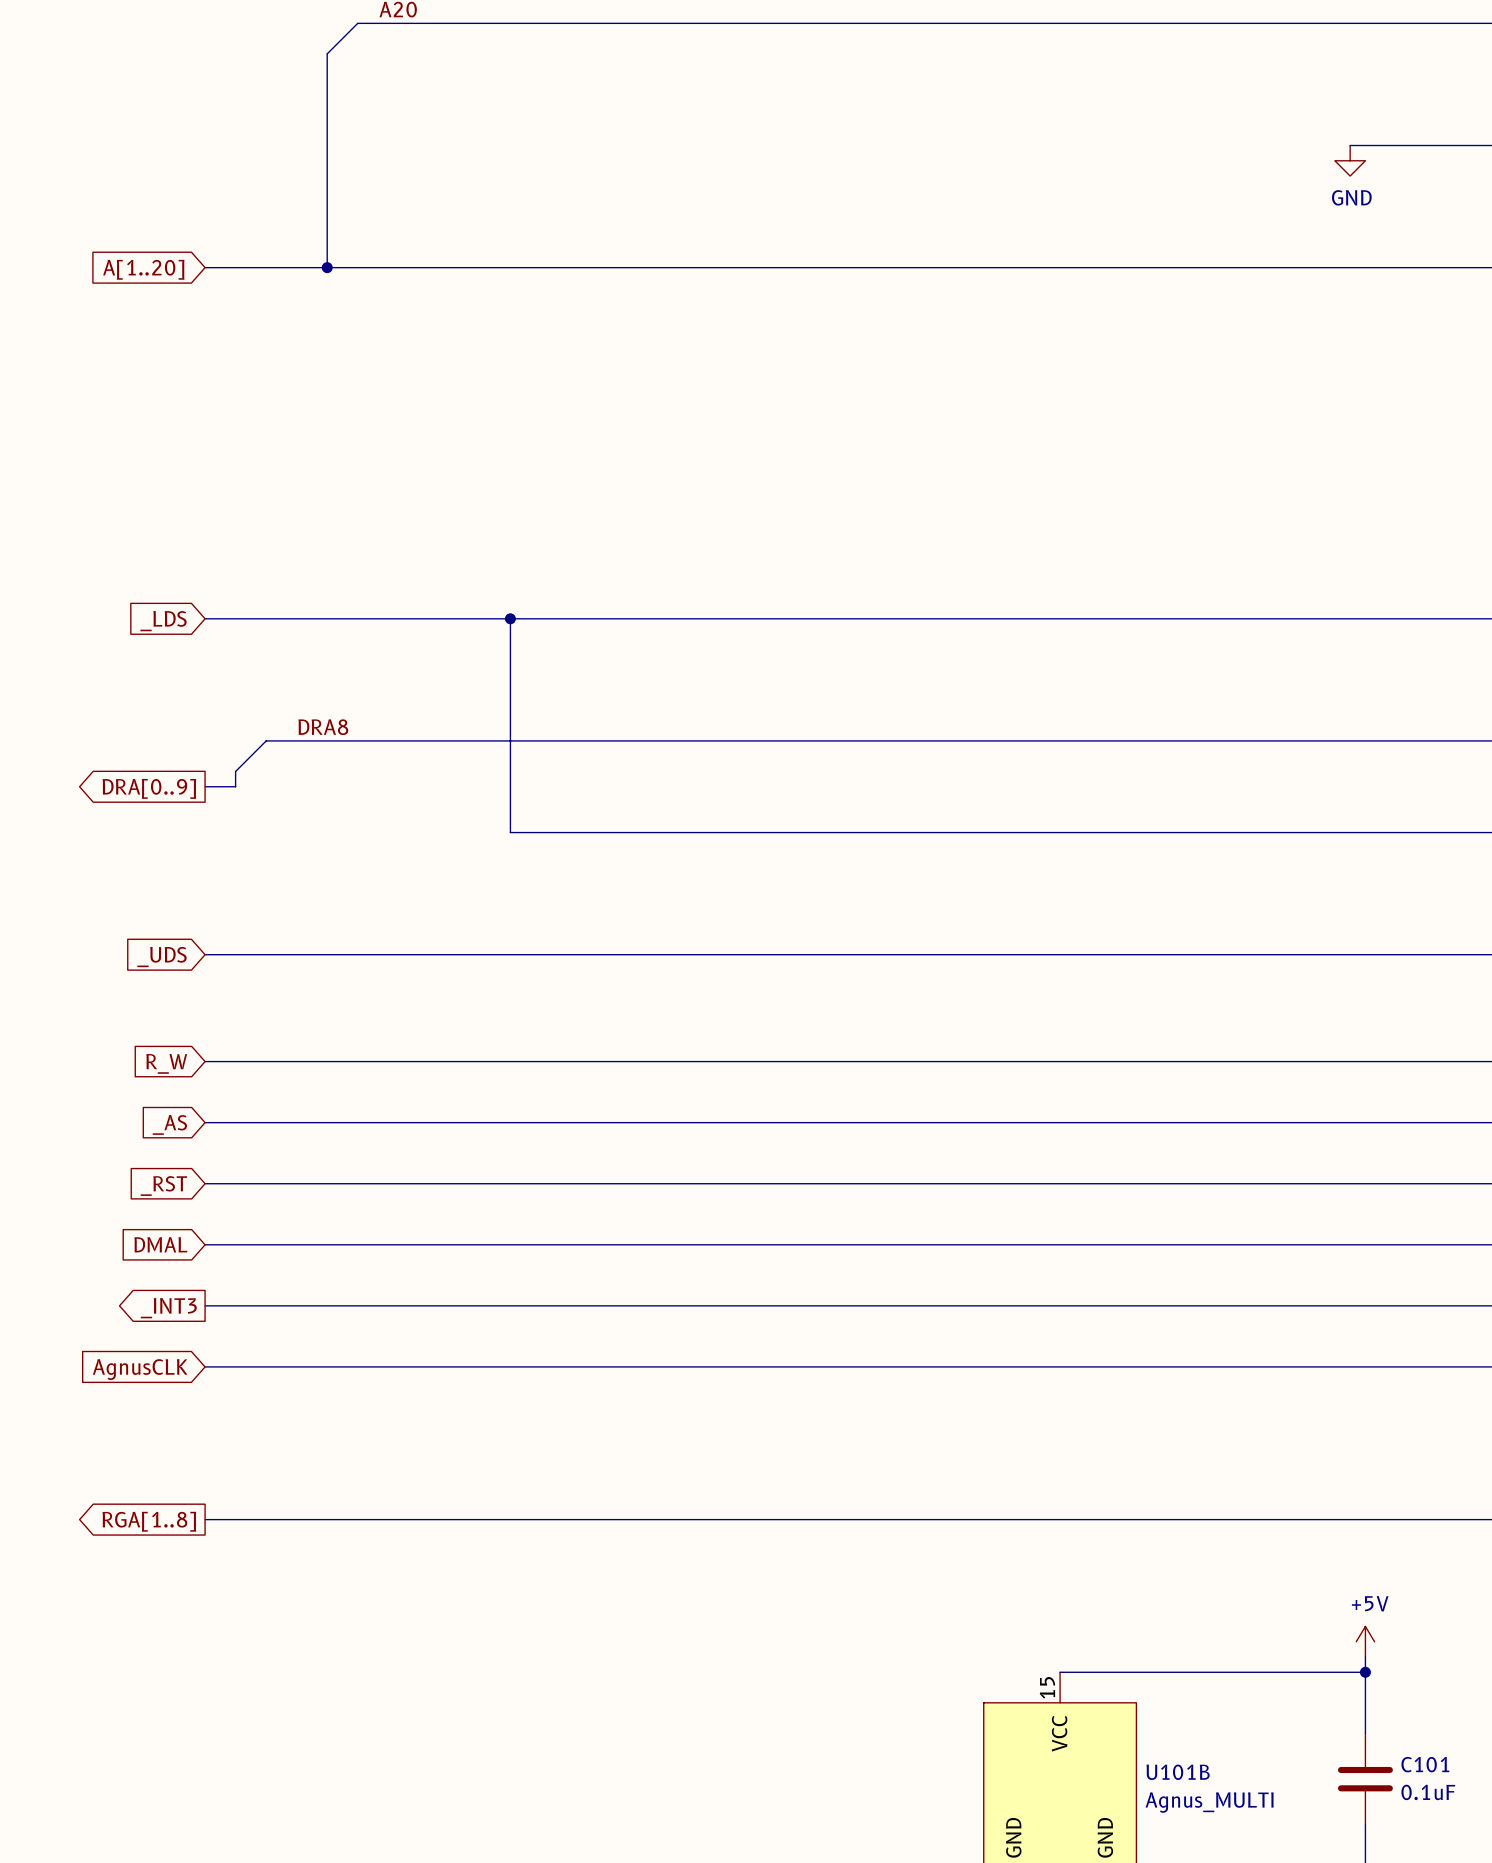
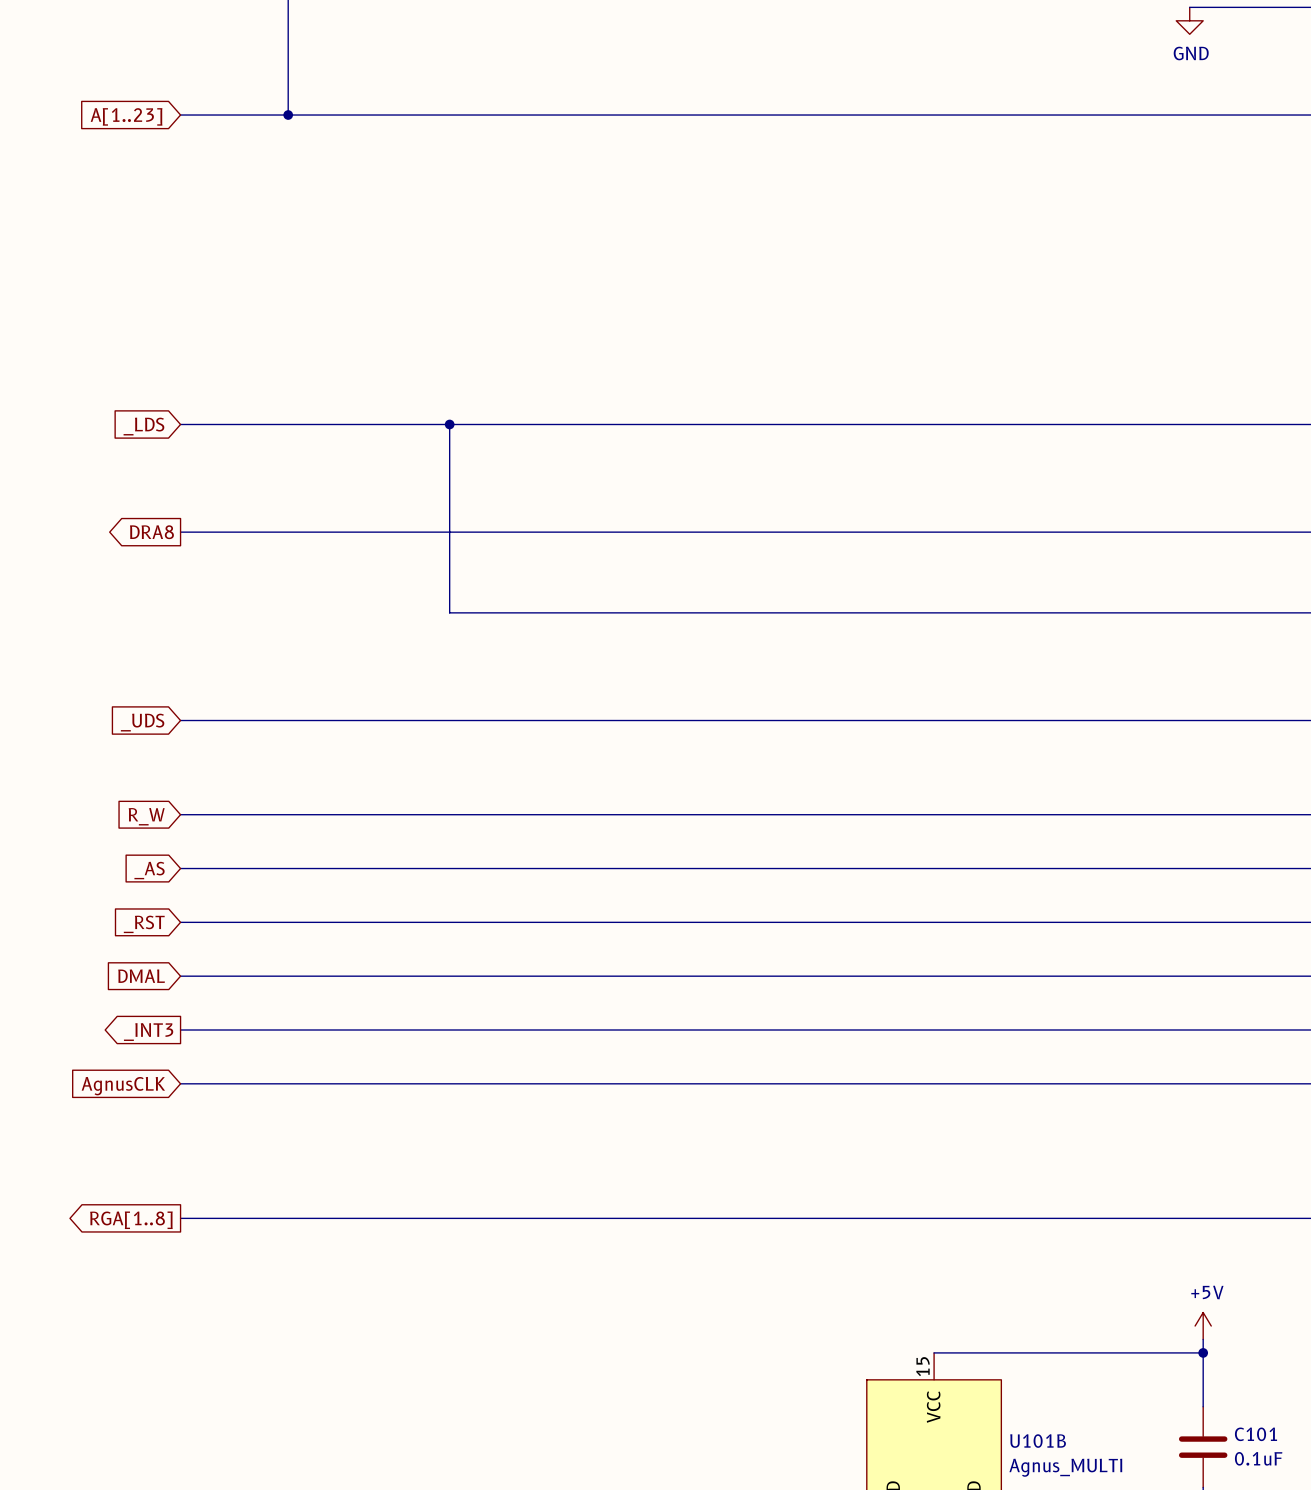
global label: A[1..20] (143, 269) -> A[1..23] (126, 116)
label: DRA8 (323, 727) -> none
wire: (266, 740) (235, 771) -> (234, 532) (180, 532)
global label: none -> DRA8 (151, 532)
bus: (235, 771) (235, 786) (205, 786) -> none
global label: DRA[0..9] (149, 788) -> none

